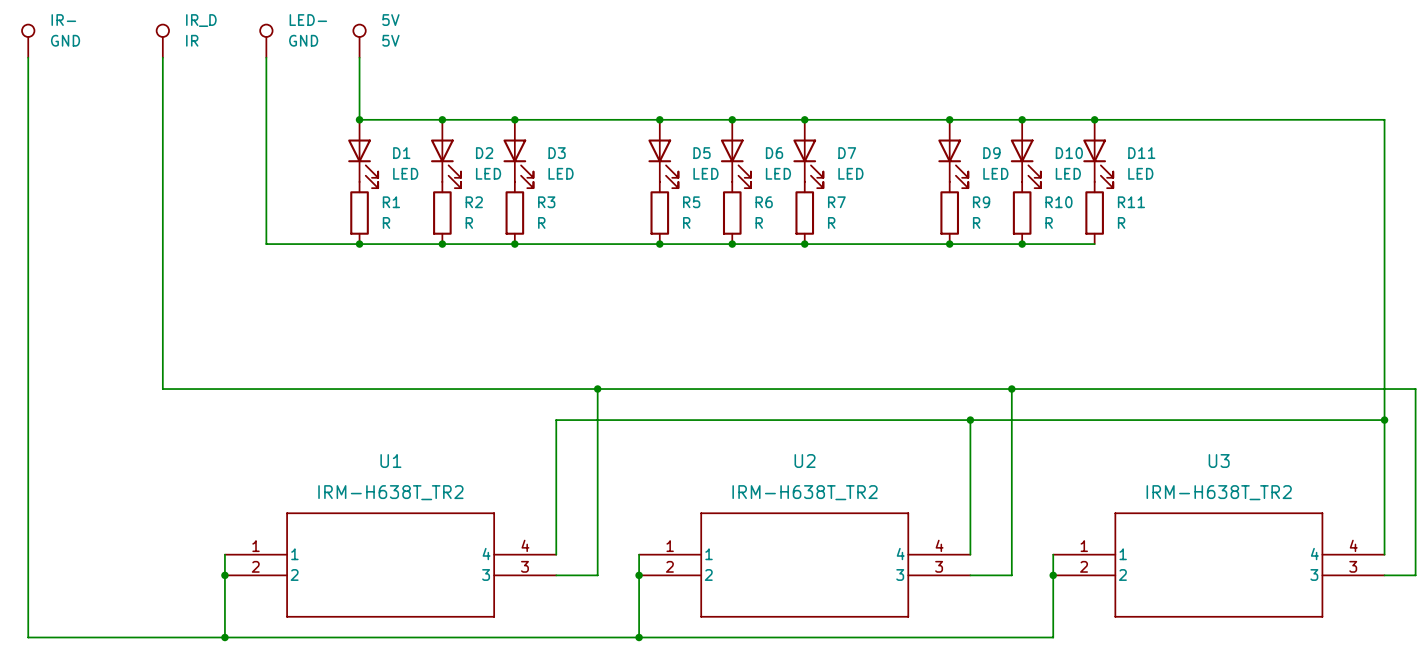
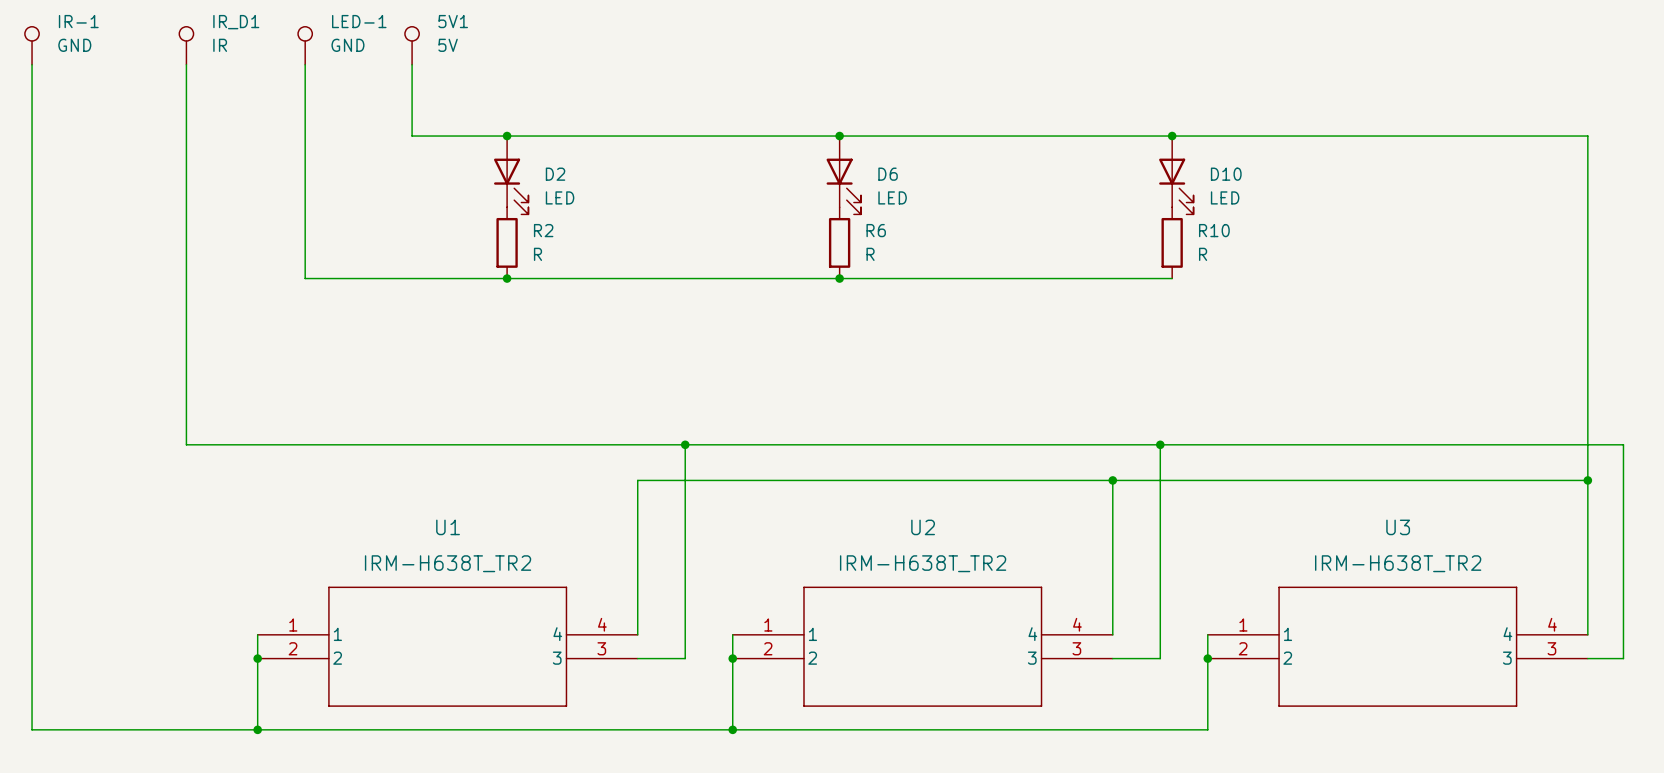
IR- name: IR- (63, 20) -> IR-1 (78, 21)
IR_D name: IR_D (201, 20) -> IR_D1 (236, 22)
LED- name: LED- (308, 20) -> LED-1 (359, 21)
5V name: 5V (390, 20) -> 5V1 (453, 21)
junction: (359, 119) -> none
junction: (514, 119) -> none
junction: (659, 119) -> none
junction: (804, 119) -> none
junction: (949, 119) -> none
junction: (1094, 119) -> none
D1: LED (363, 153) -> none
D3: LED (518, 153) -> none
D5: LED (663, 153) -> none
D7: LED (808, 153) -> none
D9: LED (953, 153) -> none
D11: LED (1098, 153) -> none
R1: R (359, 213) -> none
R3: R (514, 213) -> none
R5: R (659, 213) -> none
R7: R (804, 213) -> none
R9: R (949, 213) -> none
R11: R (1094, 213) -> none
junction: (359, 244) -> none
junction: (514, 244) -> none
junction: (659, 244) -> none
junction: (804, 244) -> none
junction: (949, 244) -> none
wire: (1022, 244) (1094, 244) -> none
junction: (1022, 244) -> none

